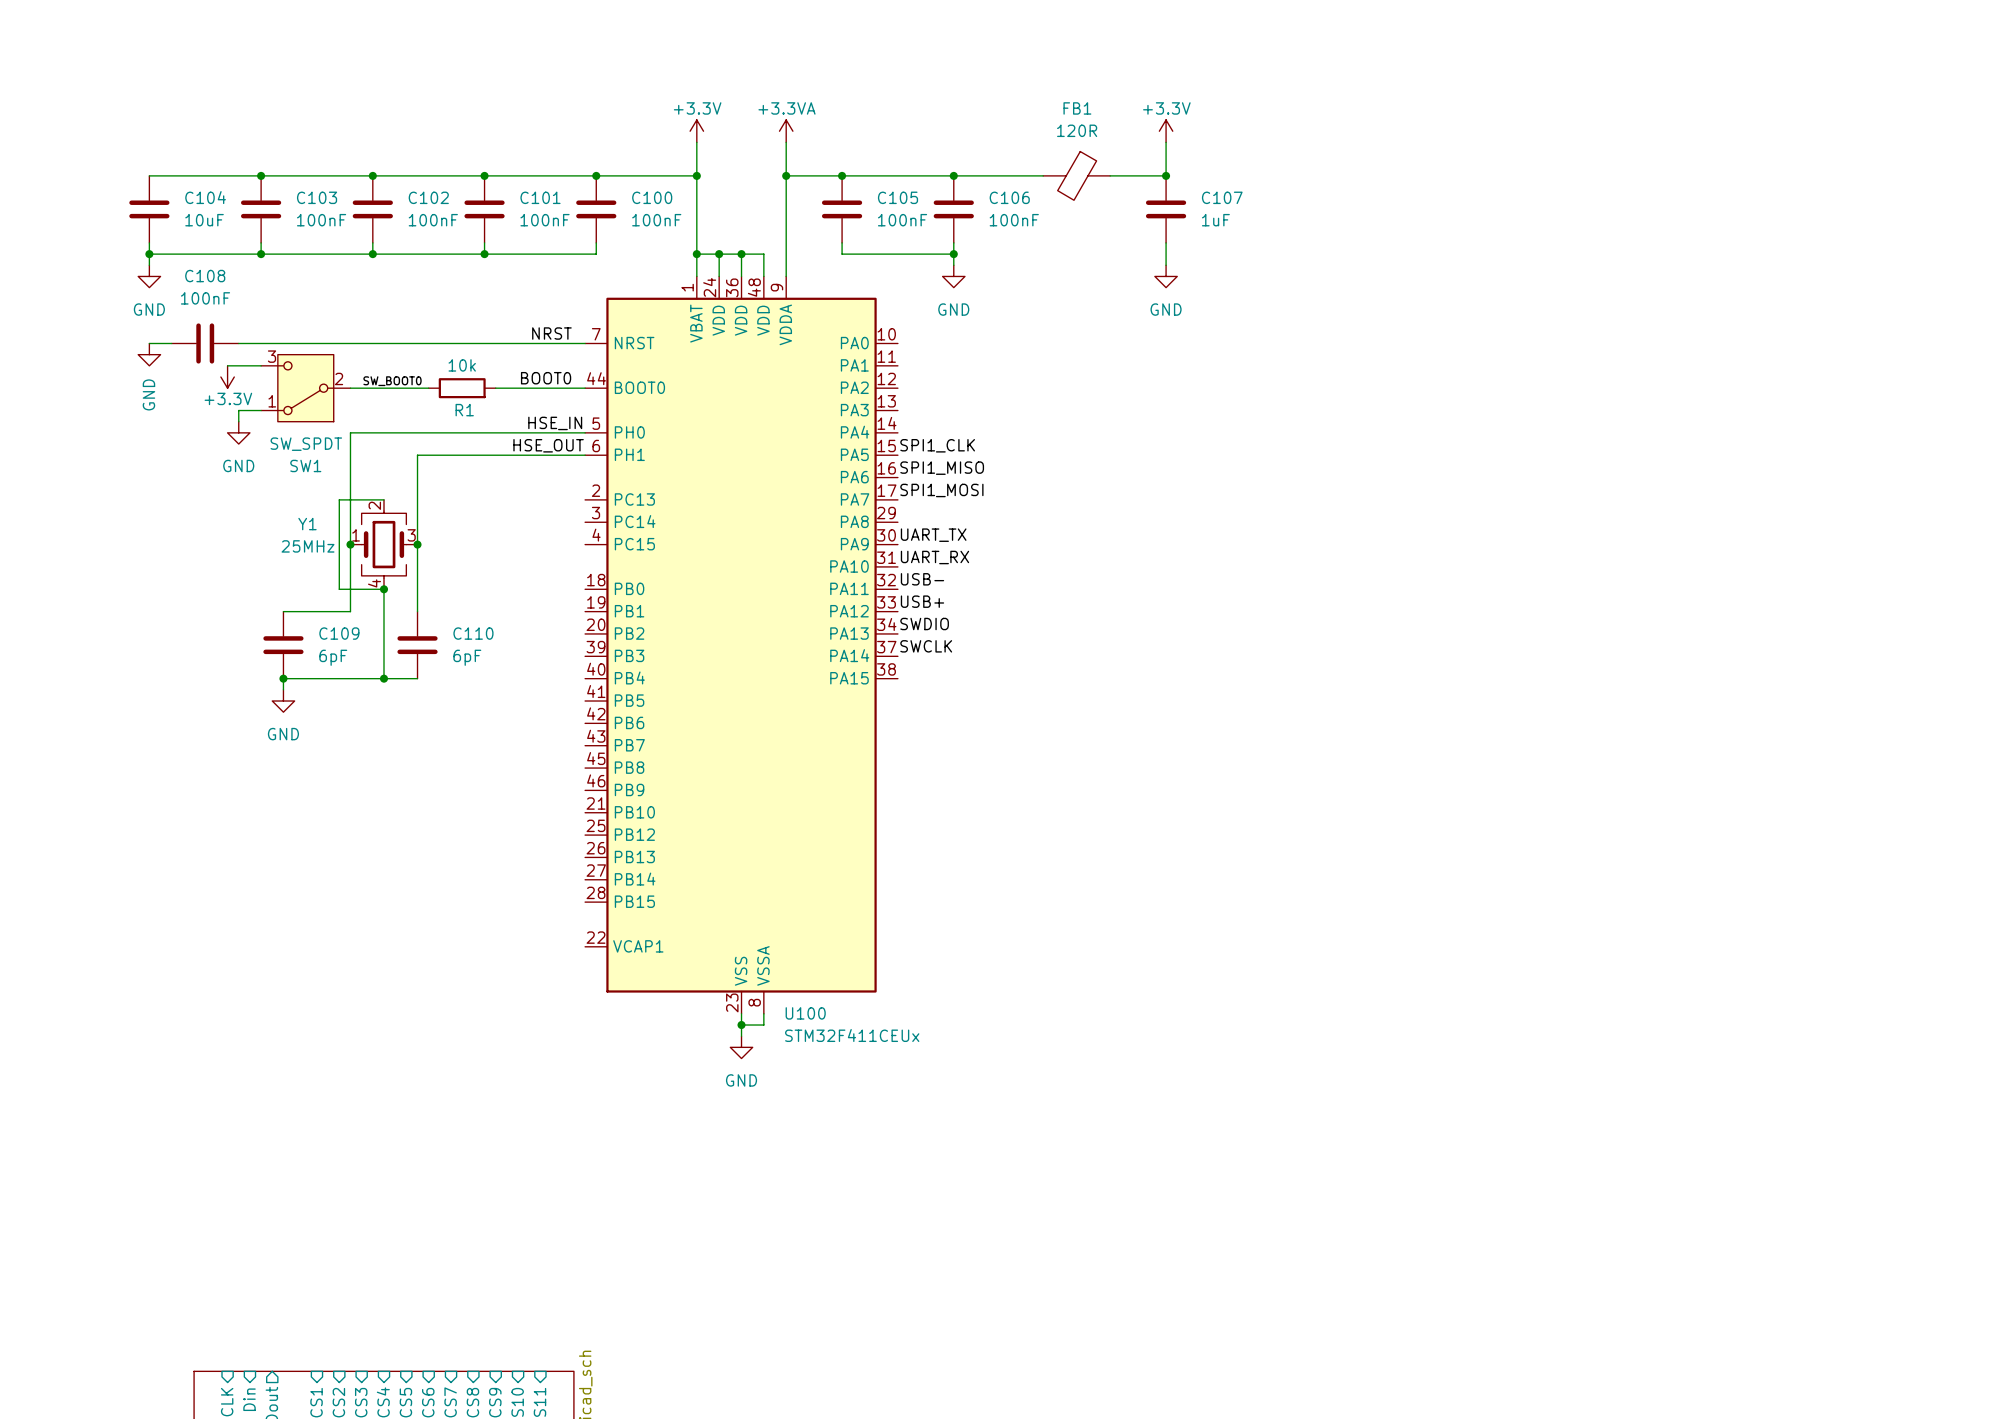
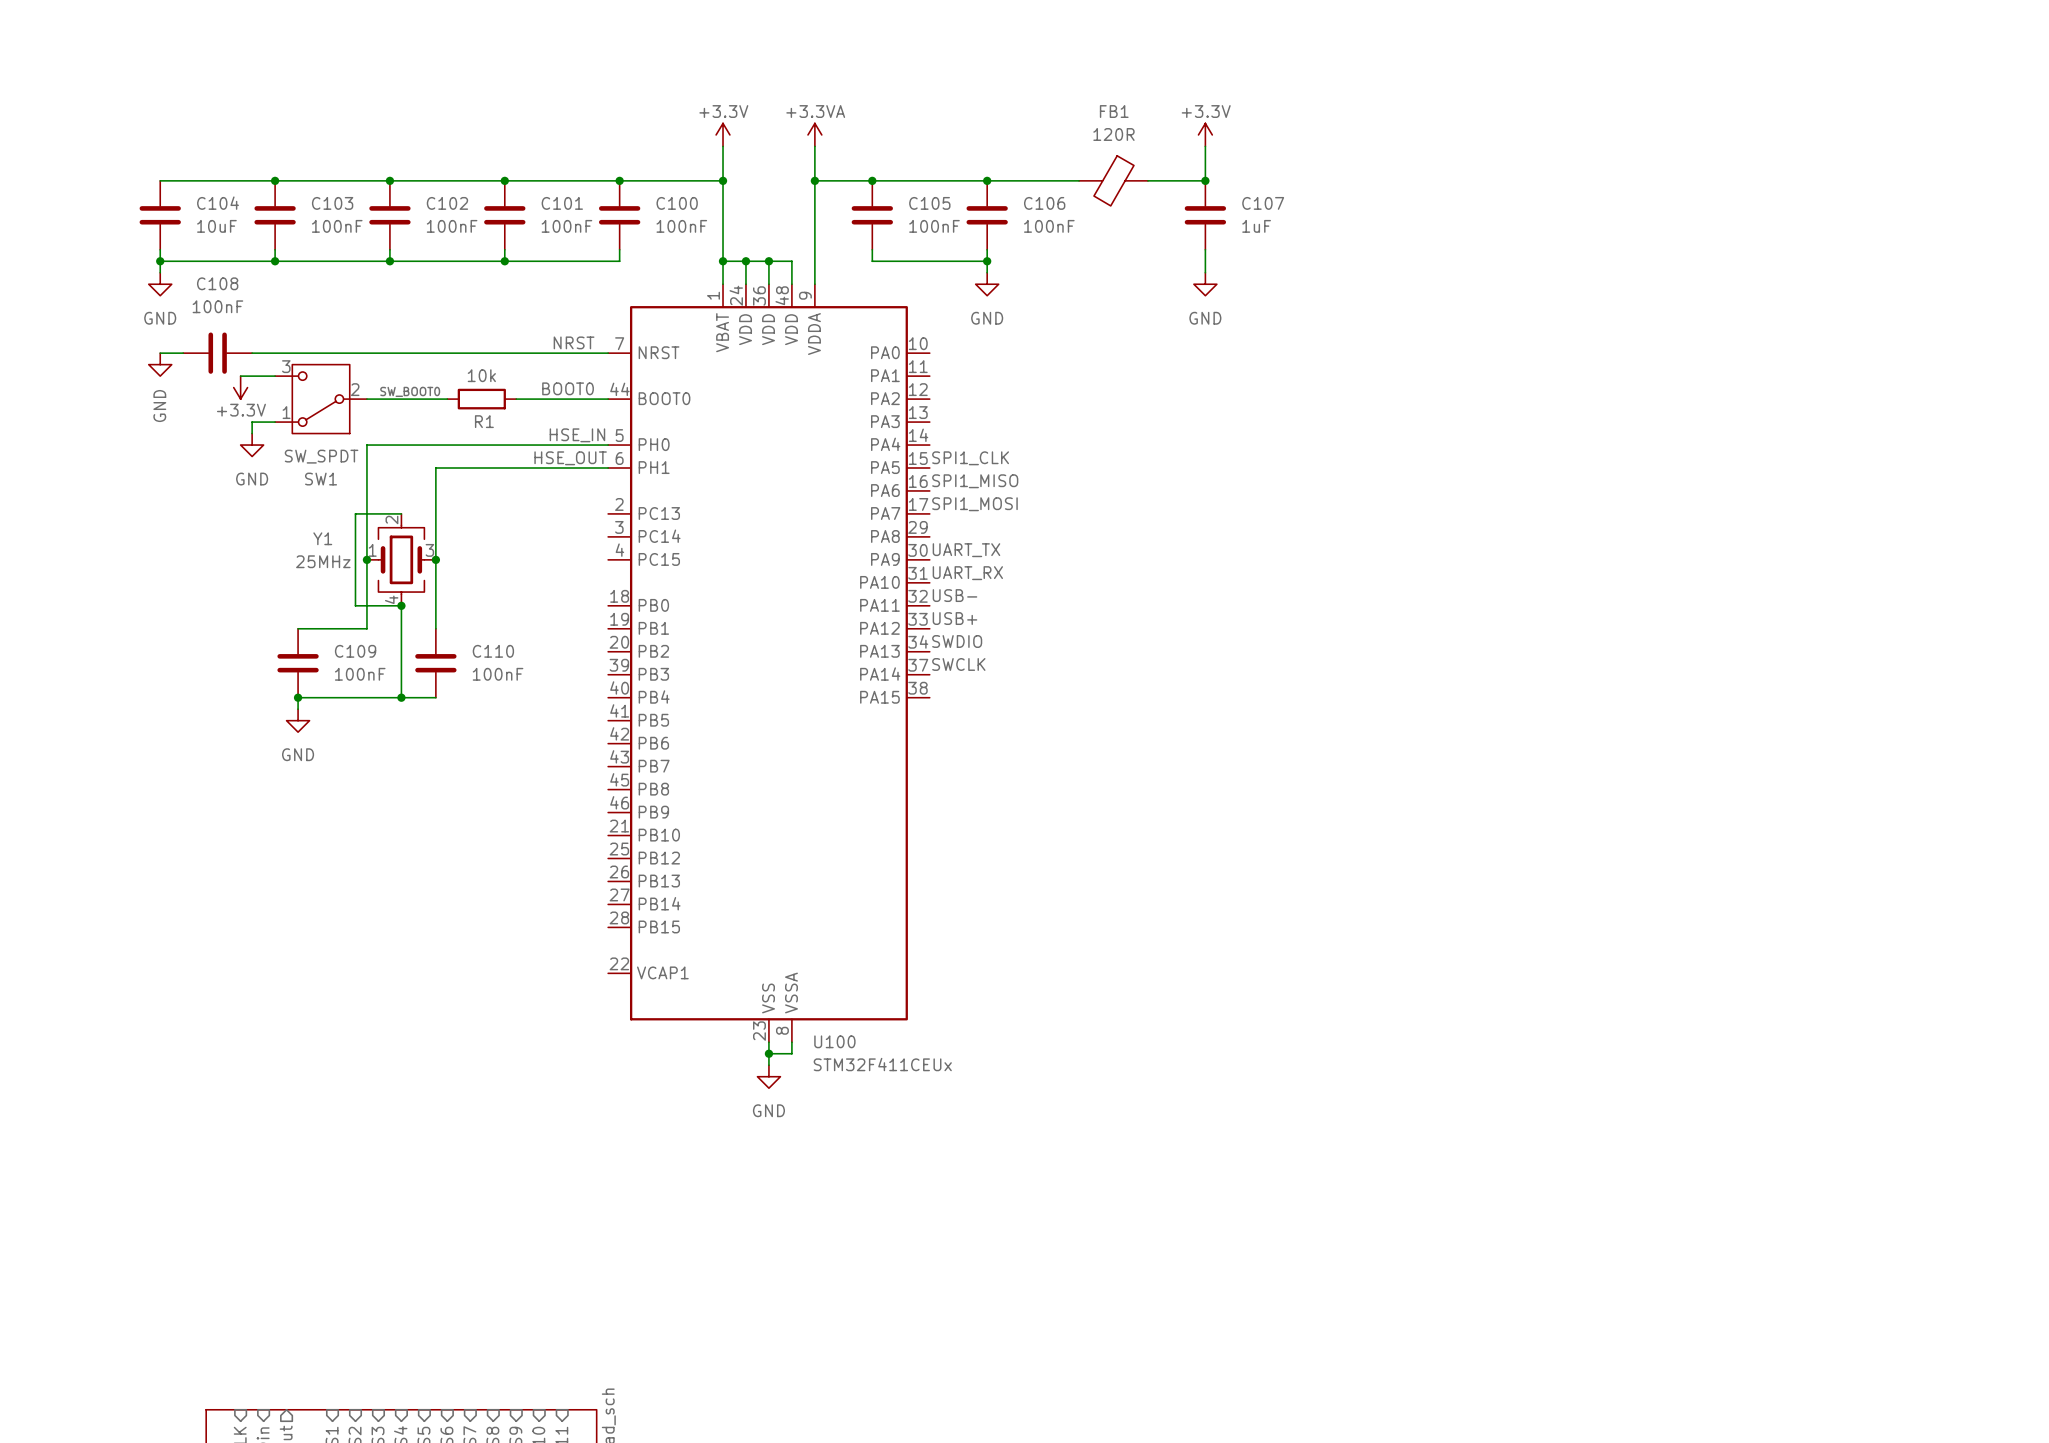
C109 value: 6pF (333, 657) -> 100nF (360, 674)
C110 value: 6pF (467, 657) -> 100nF (498, 674)

